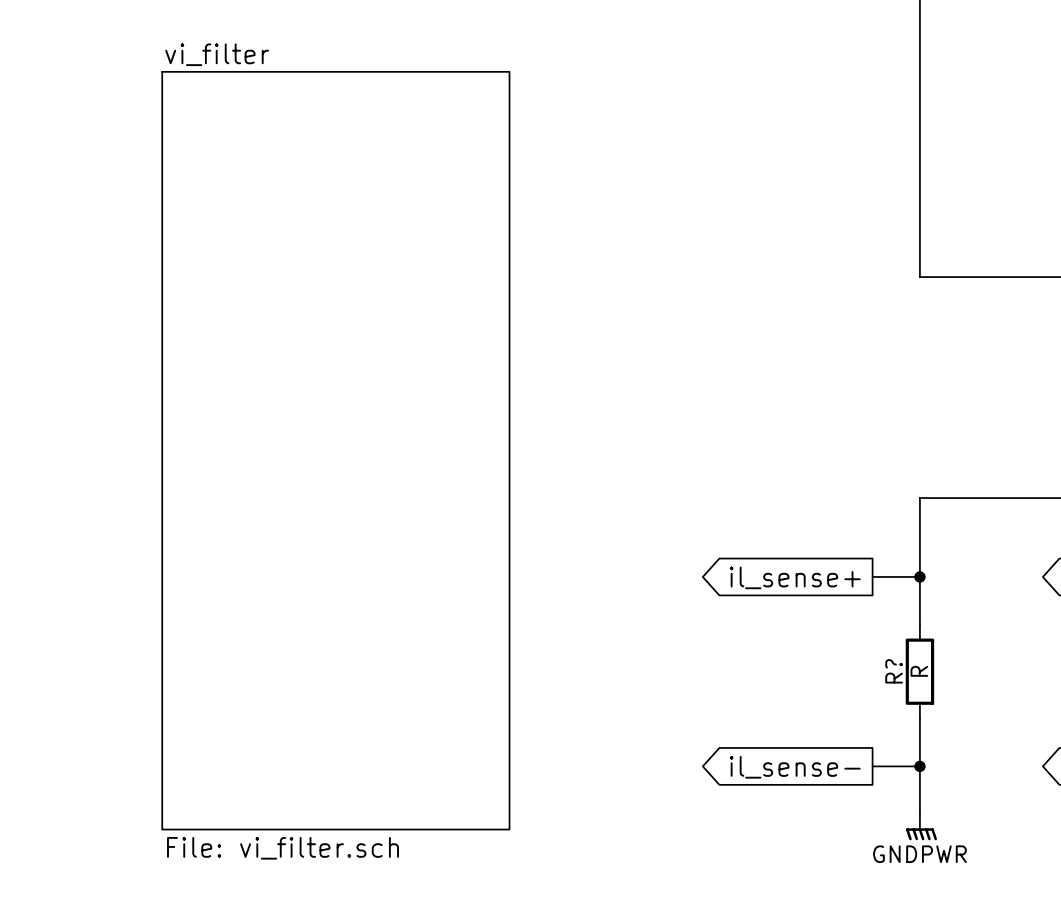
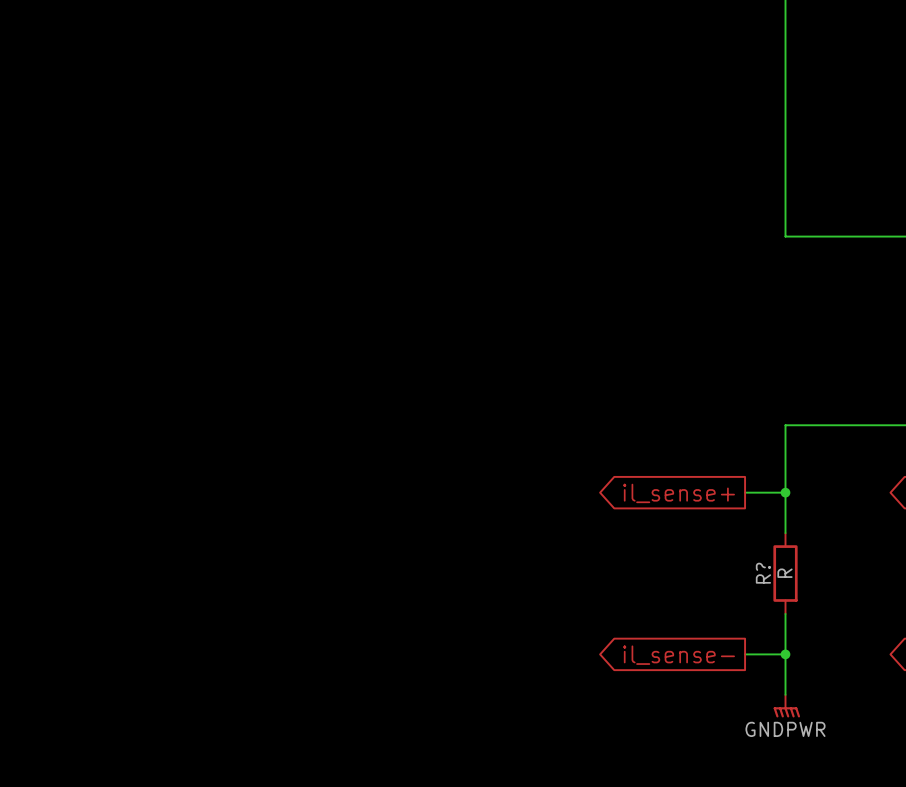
sheet vi_filter: File: vi_filter.sch (335, 450) -> none

